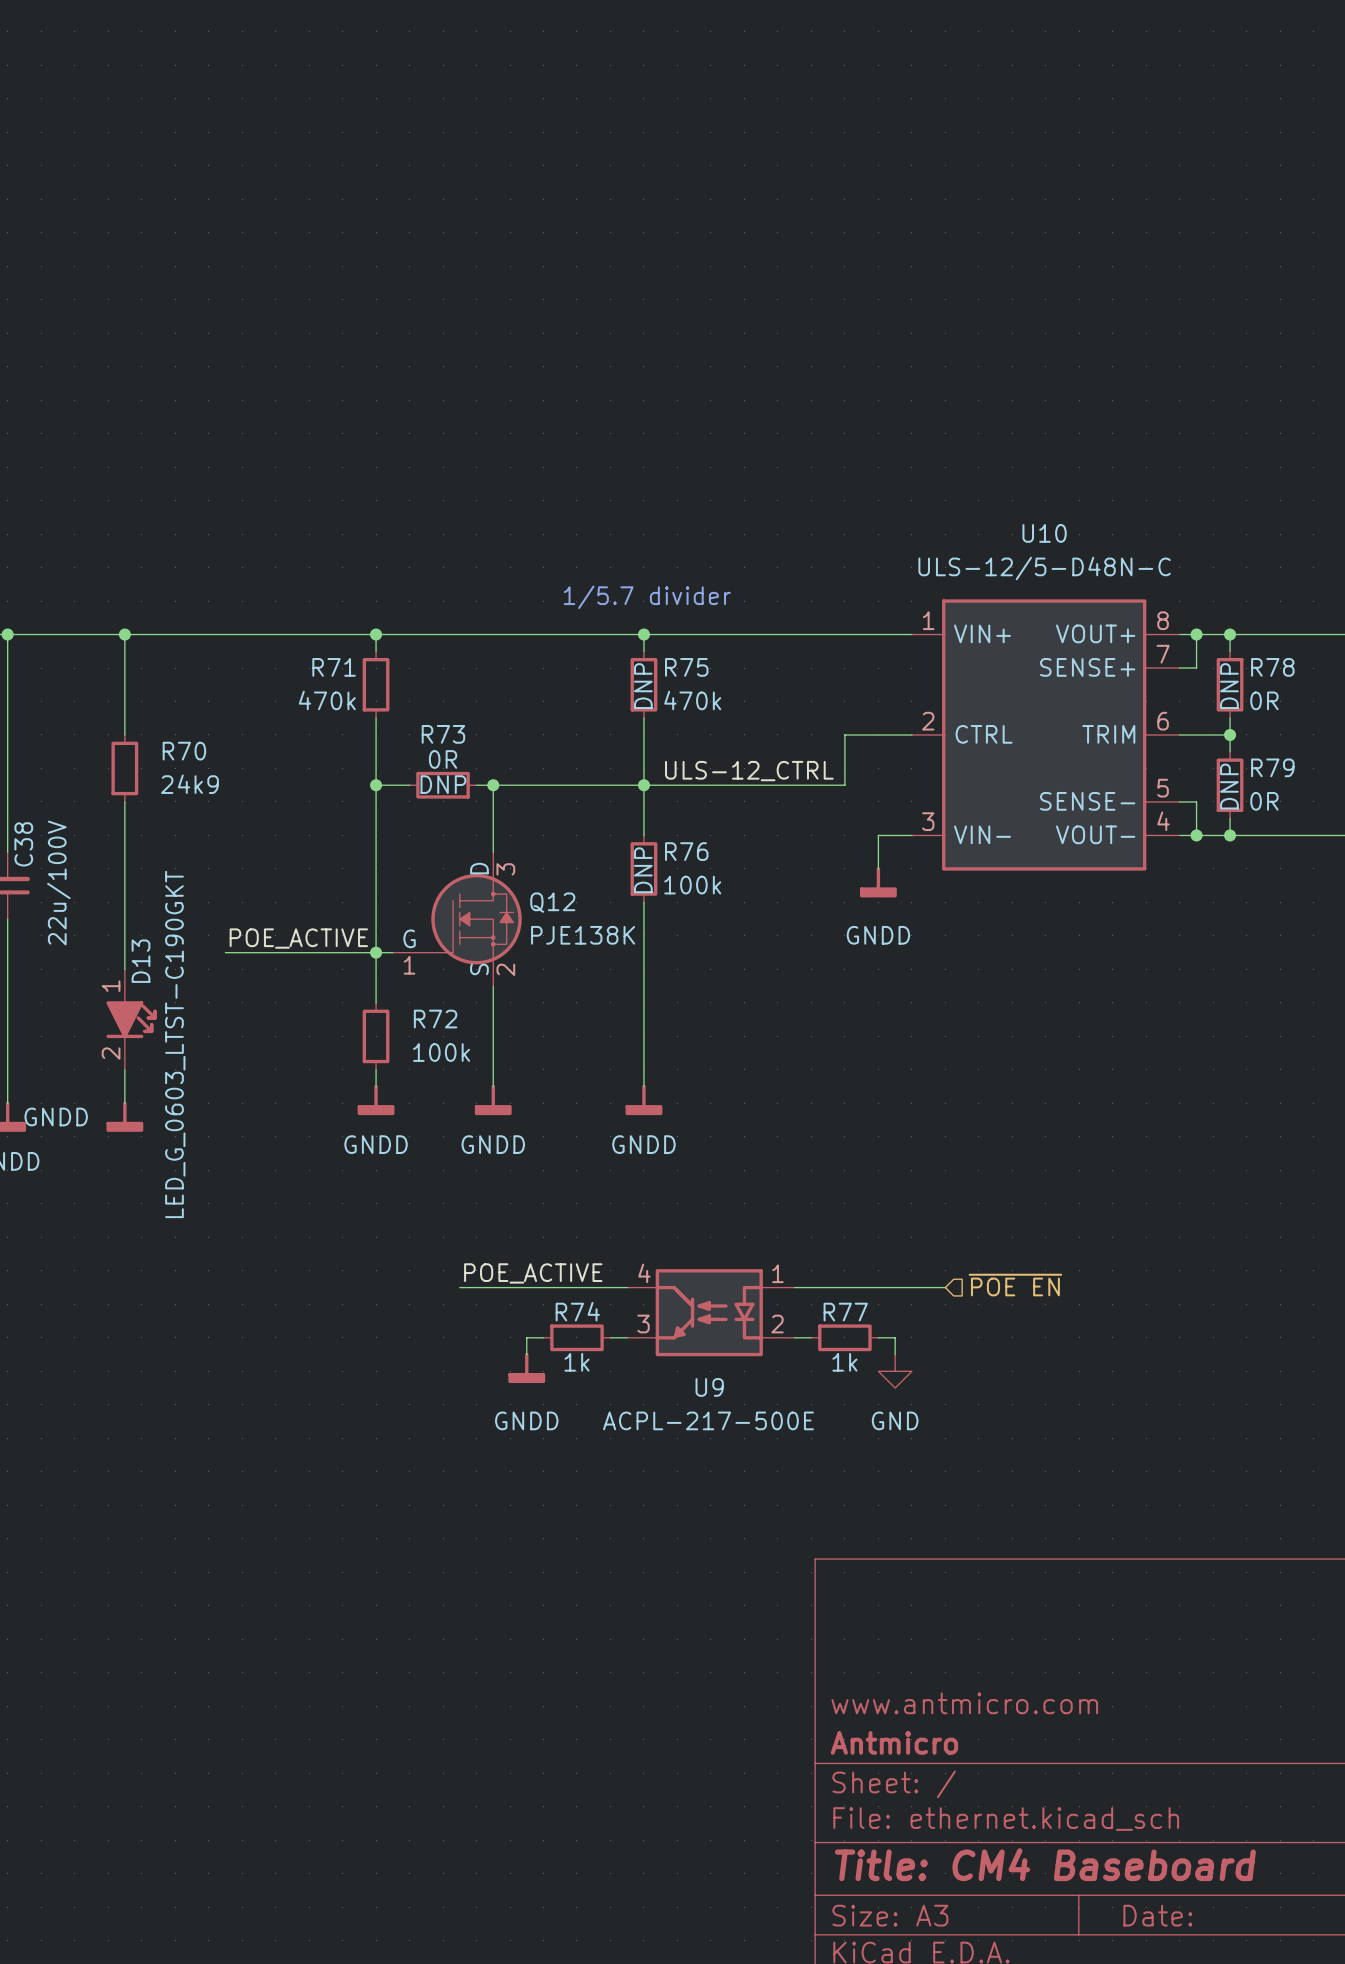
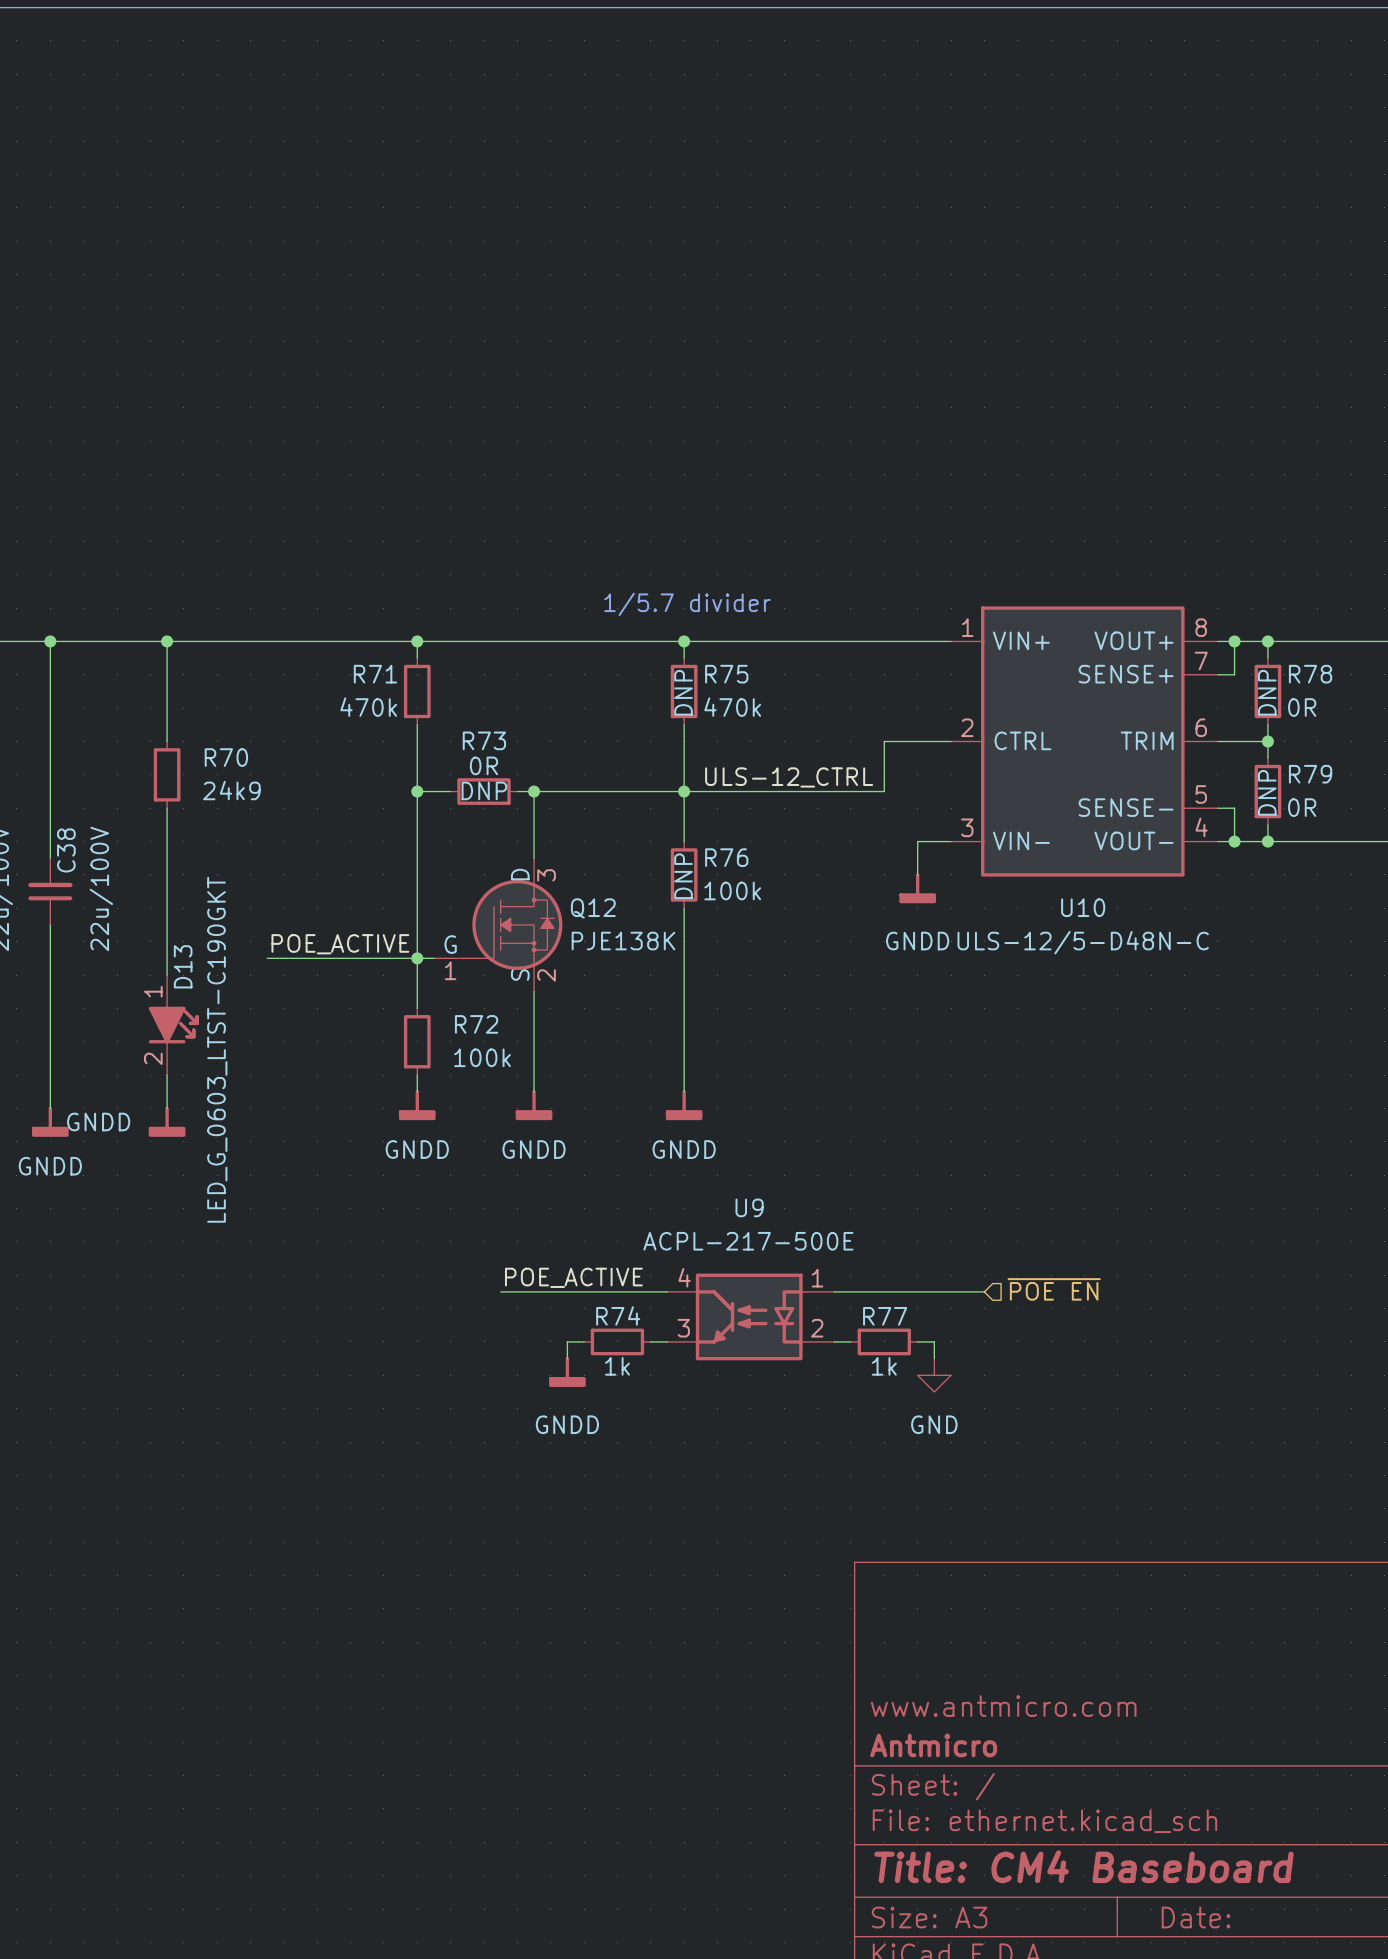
U10 name position: U10 (1044, 533) -> U10 (1083, 907)
U10 value position: ULS-12/5-D48N-C (1044, 568) -> ULS-12/5-D48N-C (1083, 942)
U9 name position: U9 (709, 1387) -> U9 (749, 1207)
U9 value position: ACPL-217-500E (708, 1420) -> ACPL-217-500E (748, 1241)

